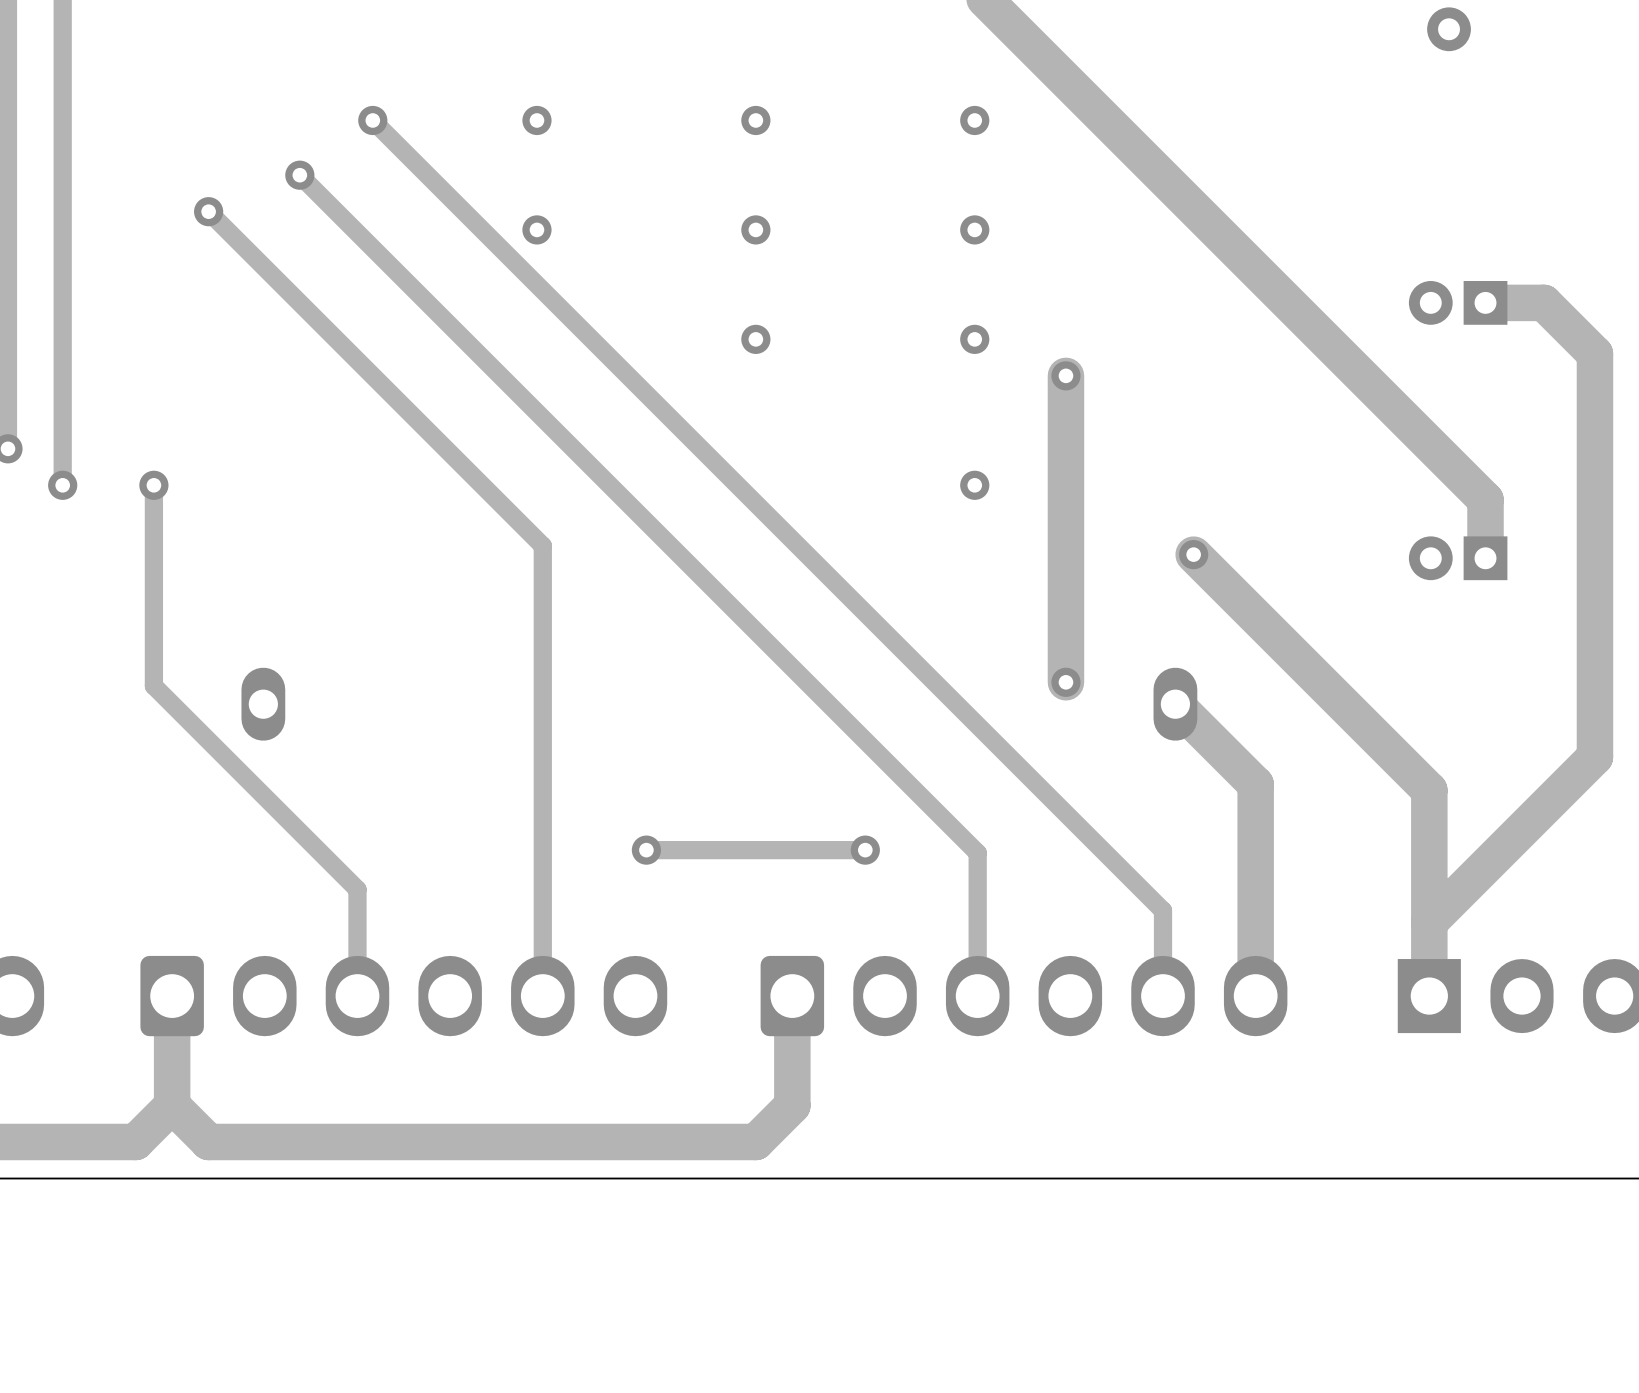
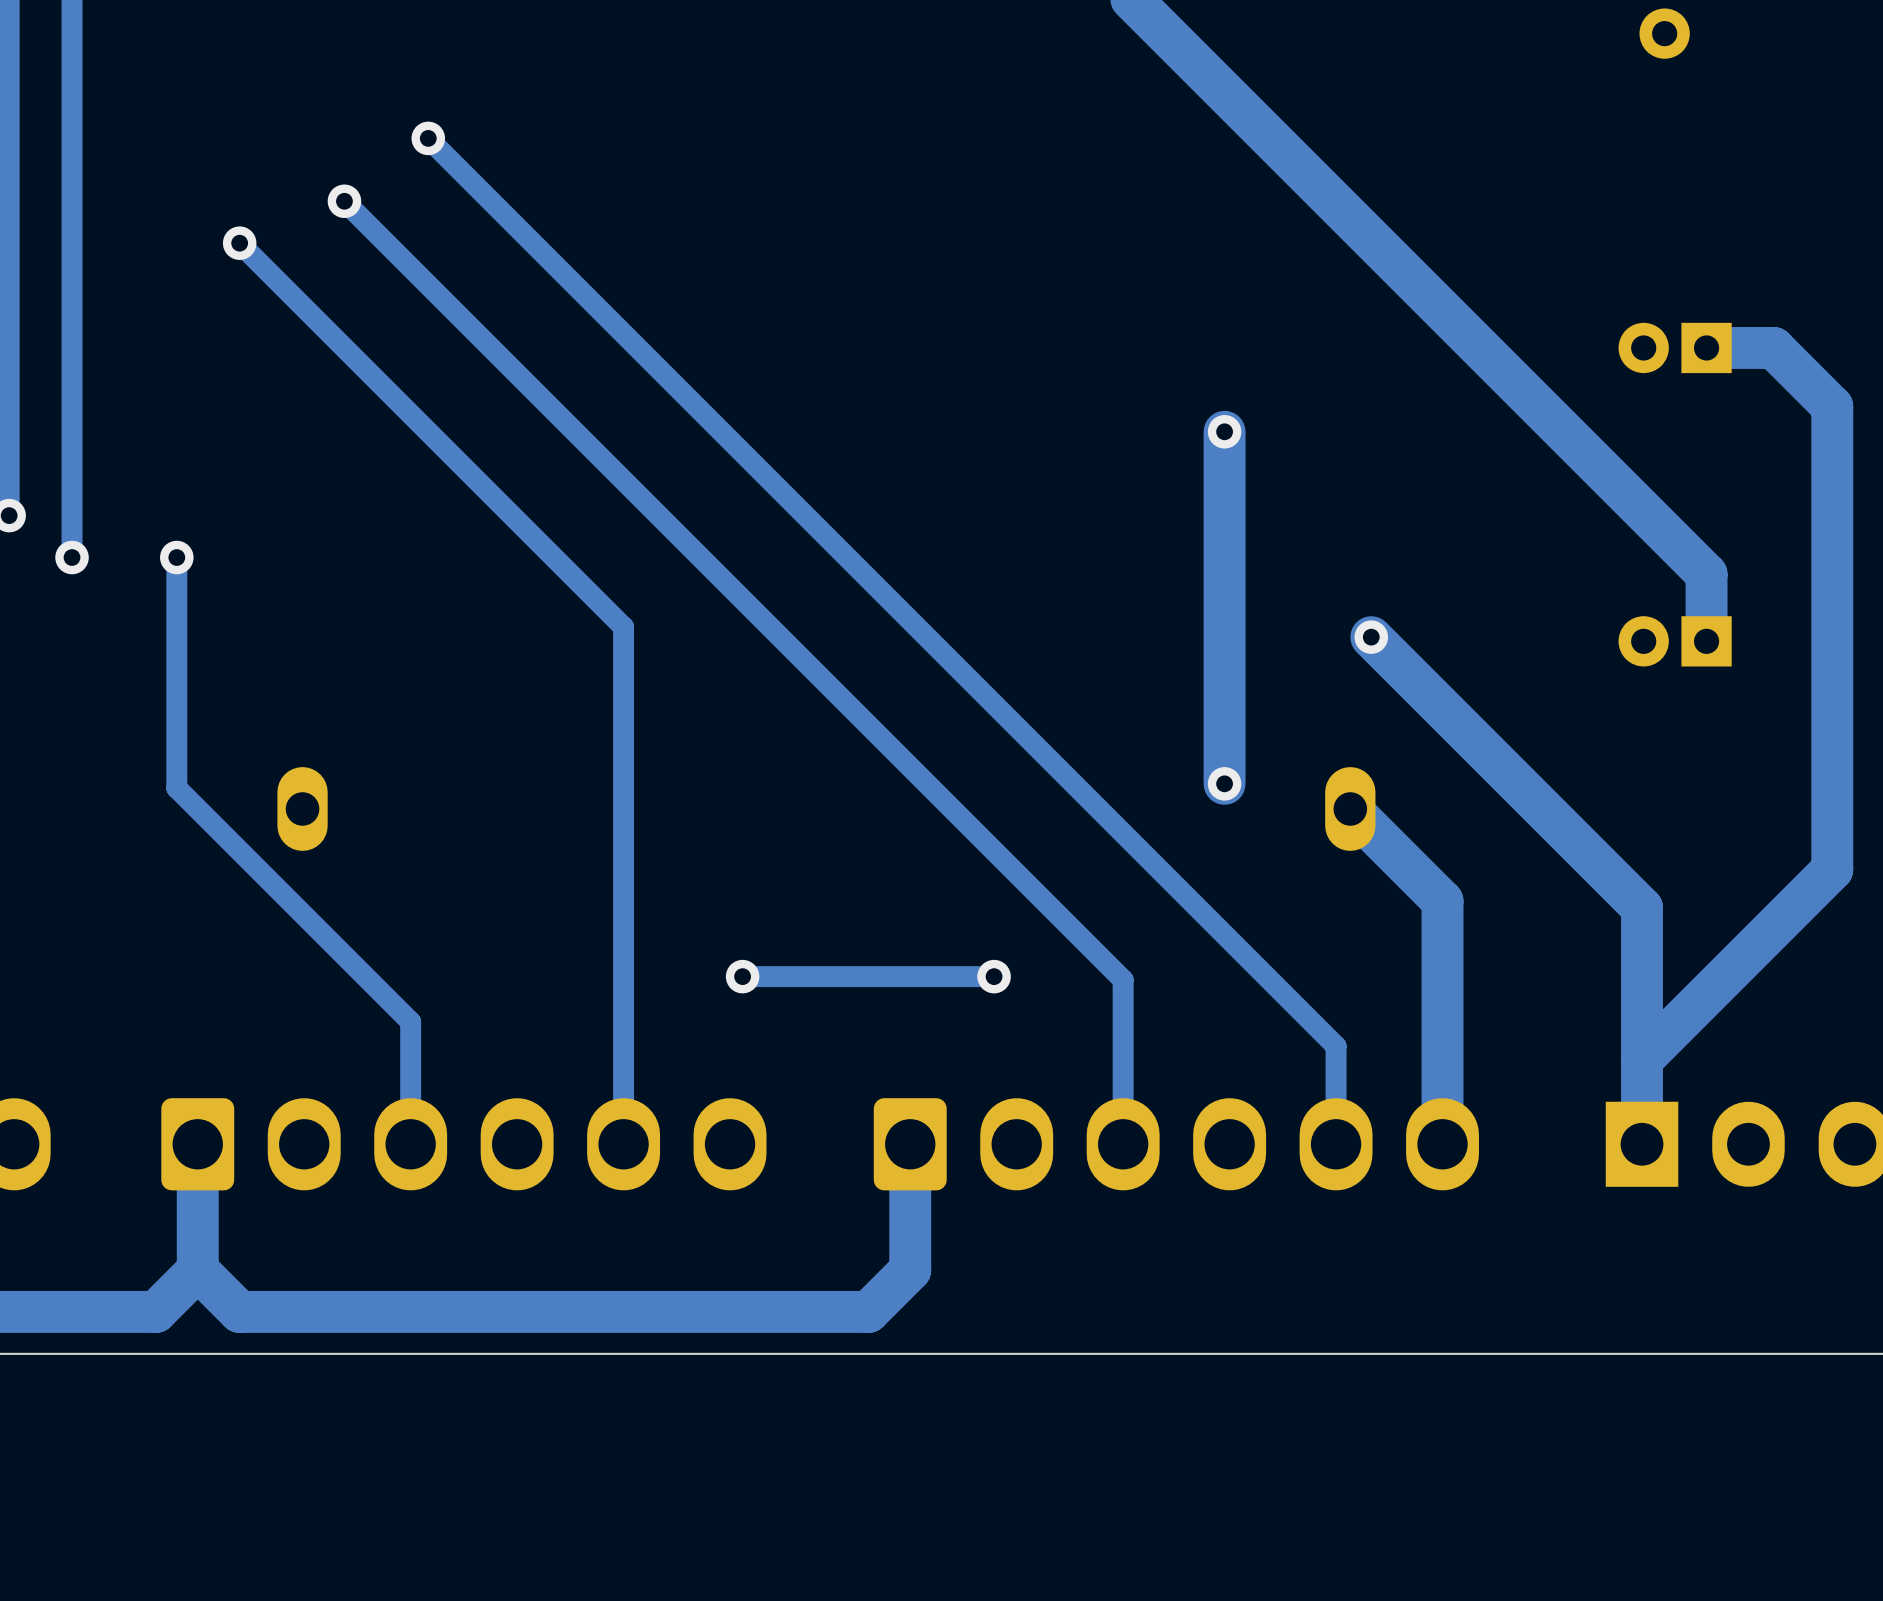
via: (536, 120) -> none
via: (755, 120) -> none
via: (974, 120) -> none
via: (536, 229) -> none
via: (755, 229) -> none
via: (974, 229) -> none
via: (755, 339) -> none
via: (974, 339) -> none
via: (974, 485) -> none

